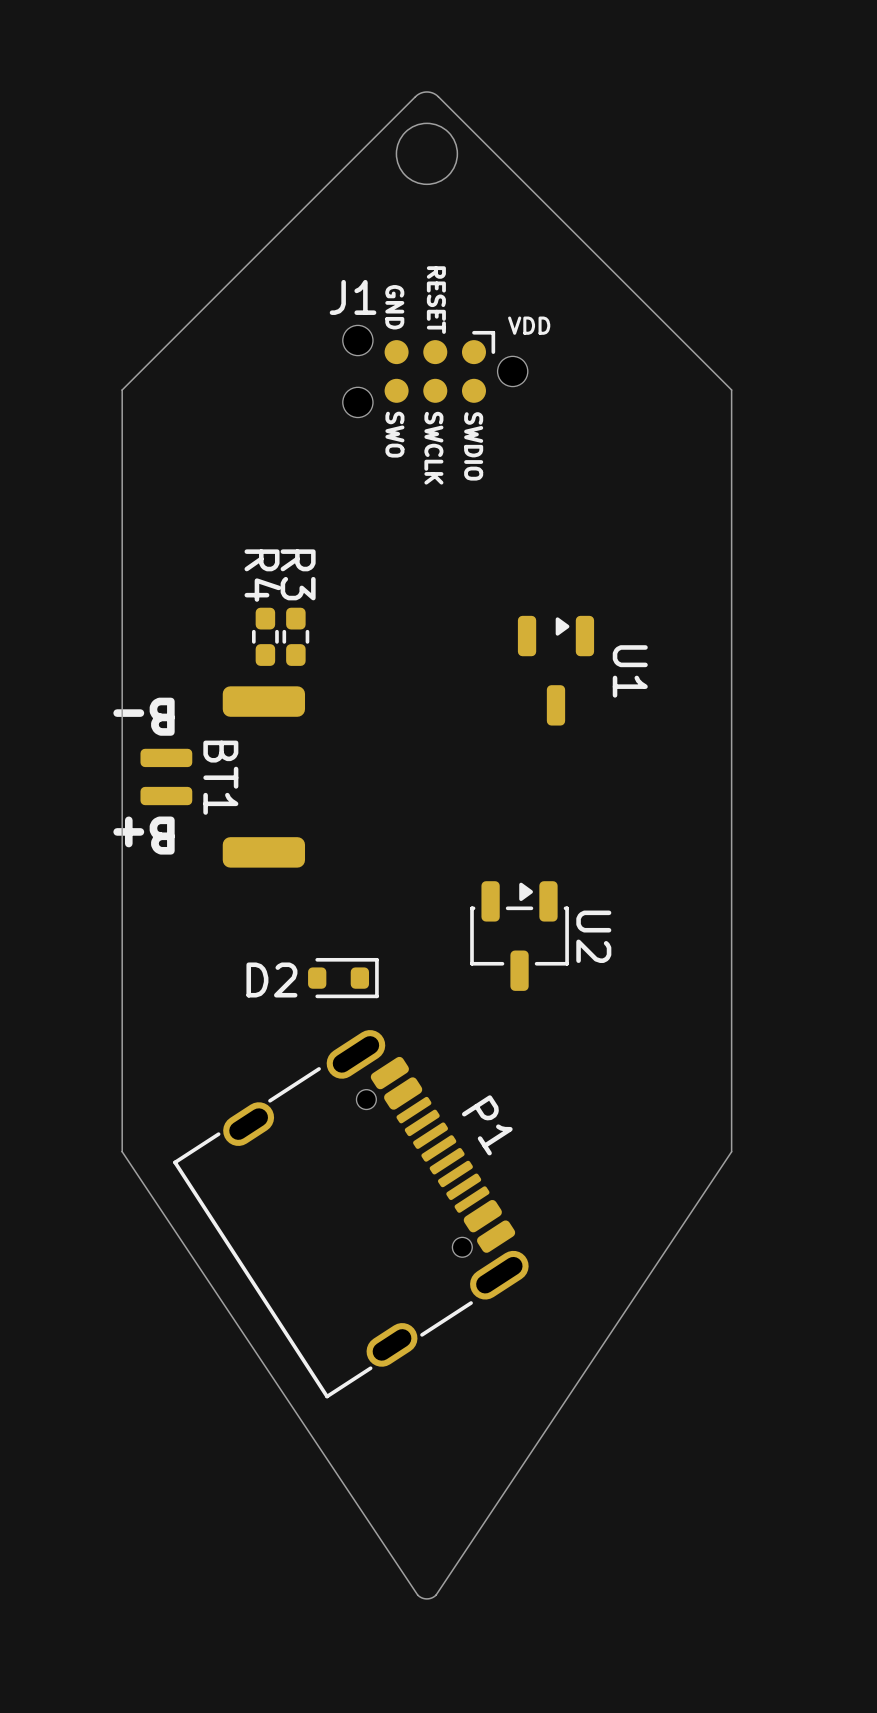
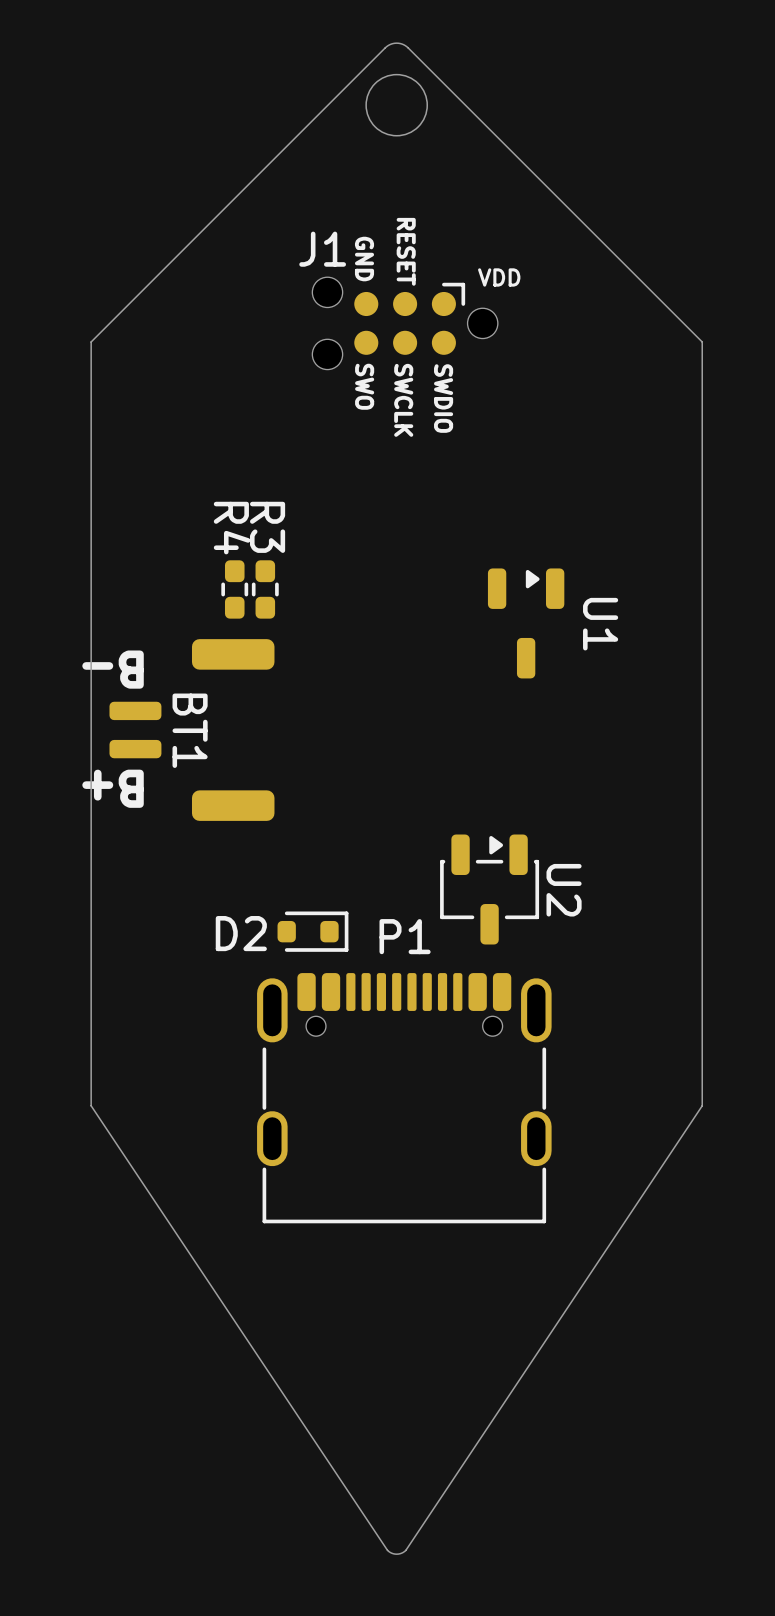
P1 rotation: 0° (350, 1214) -> 57° counterclockwise (404, 1098)

